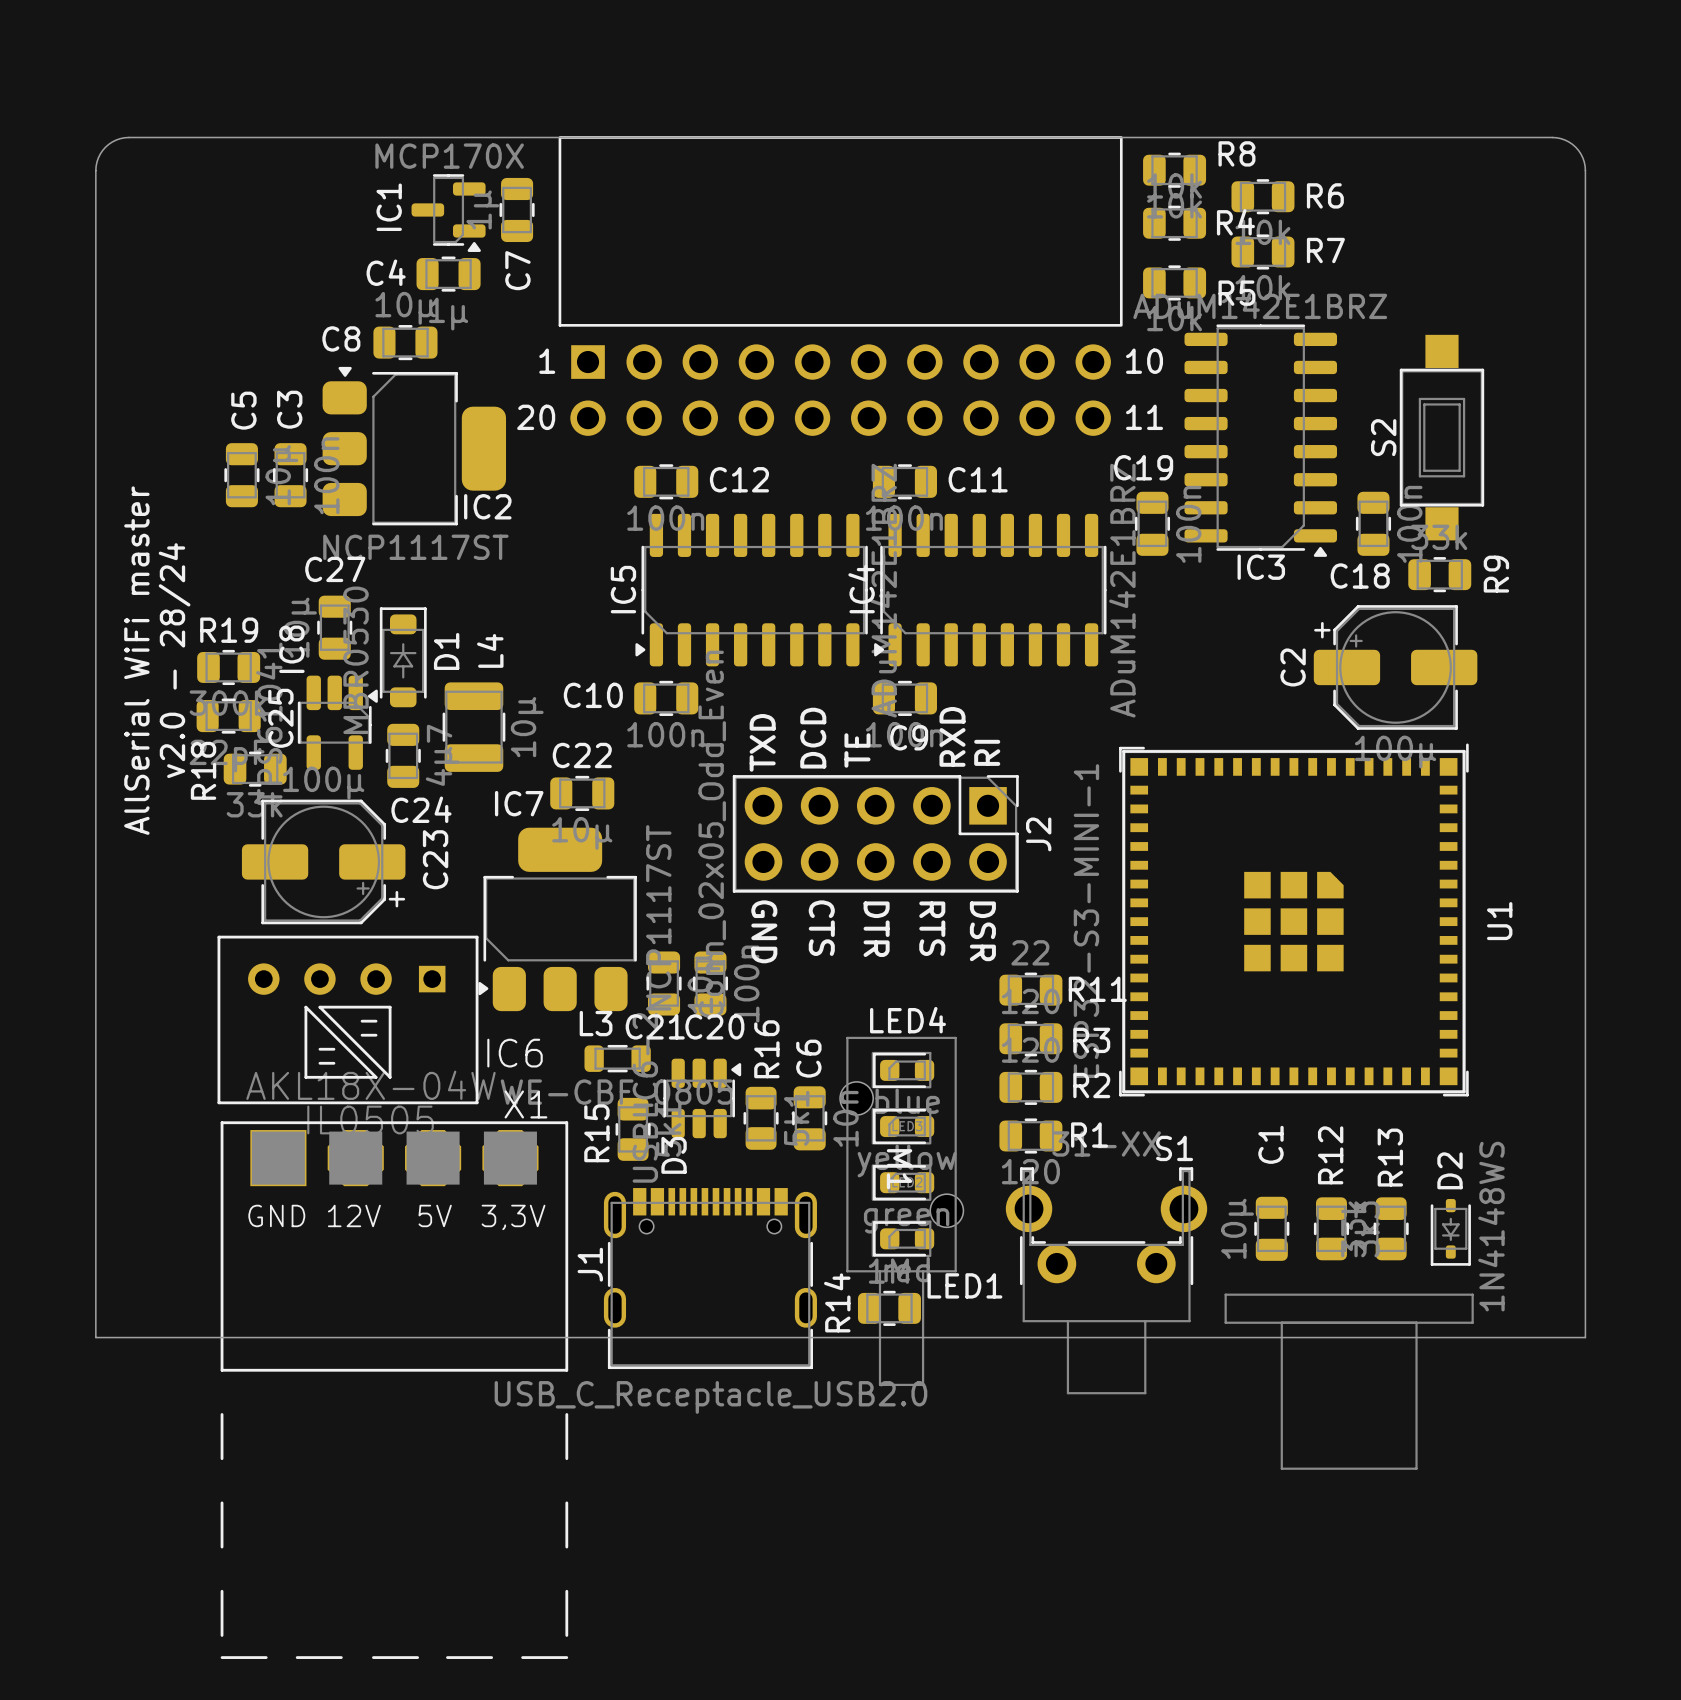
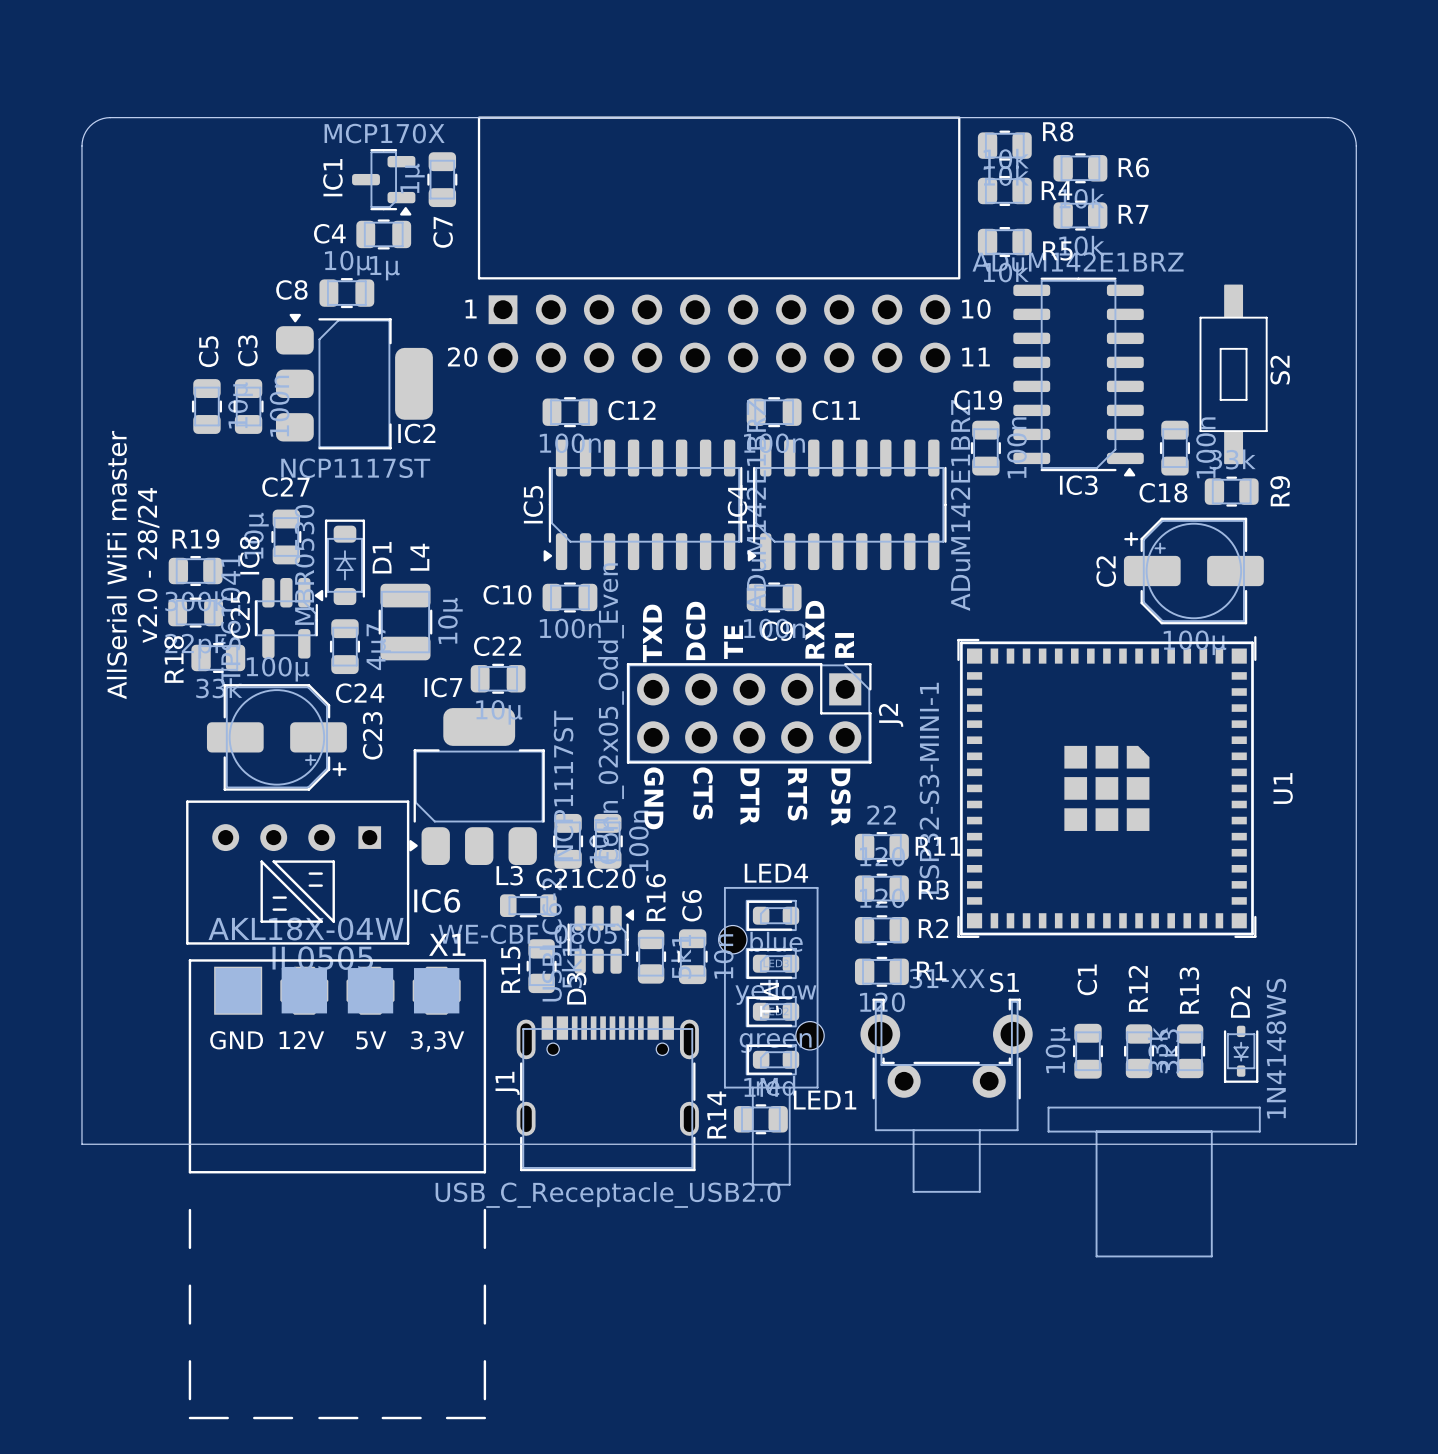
S2 footprint: [1399, 334, 1485, 541] -> [1199, 284, 1268, 465]
S2 name position: S2 (1383, 437) -> S2 (1280, 370)

